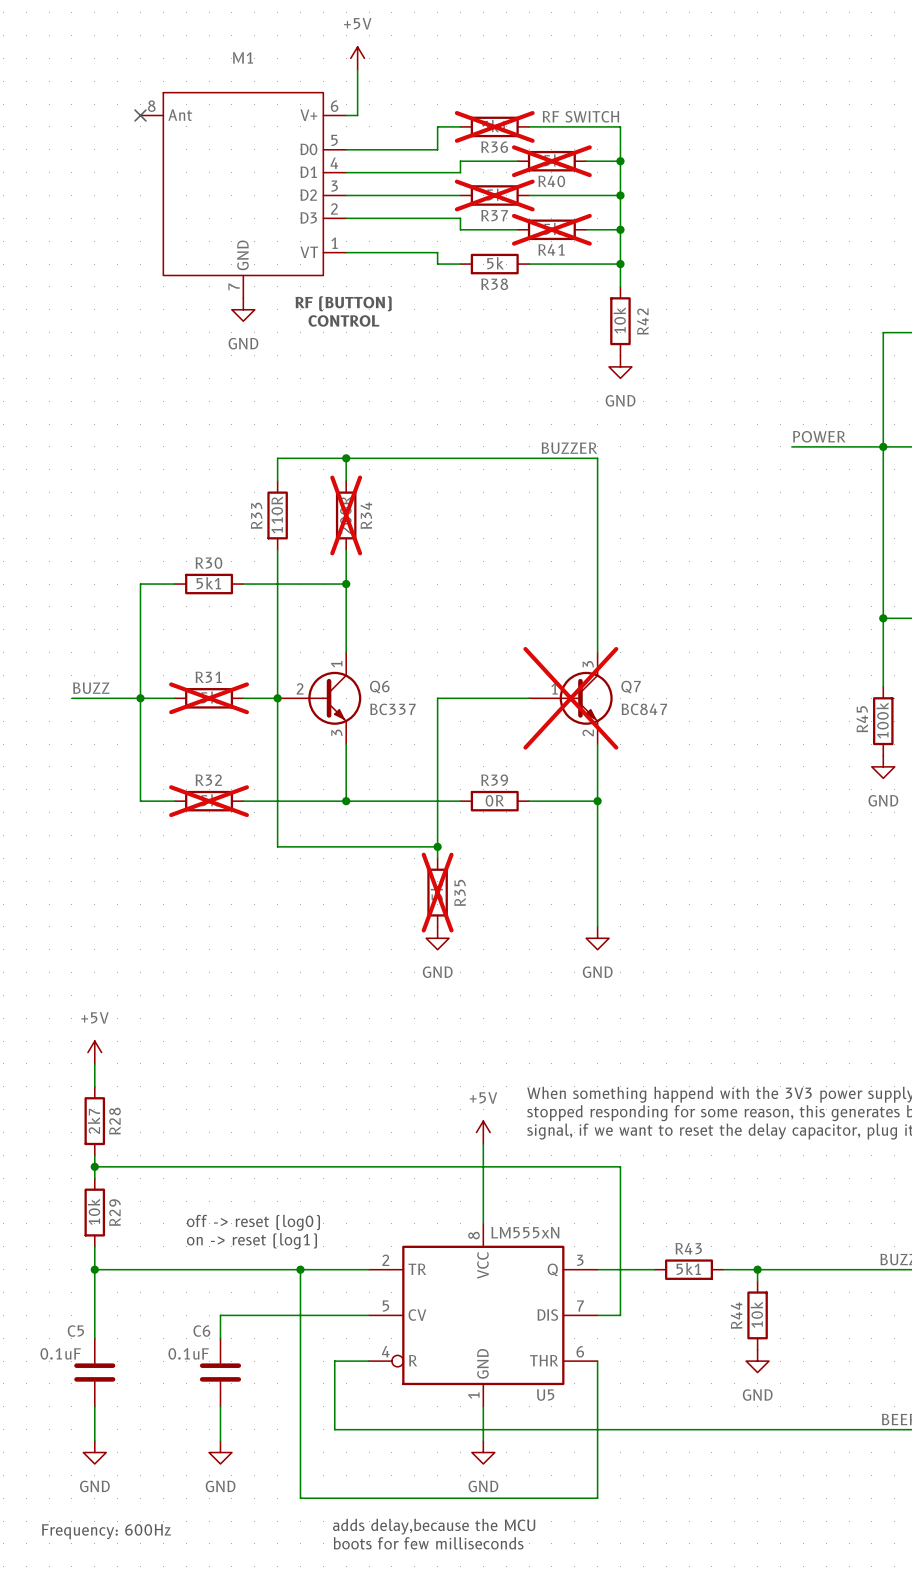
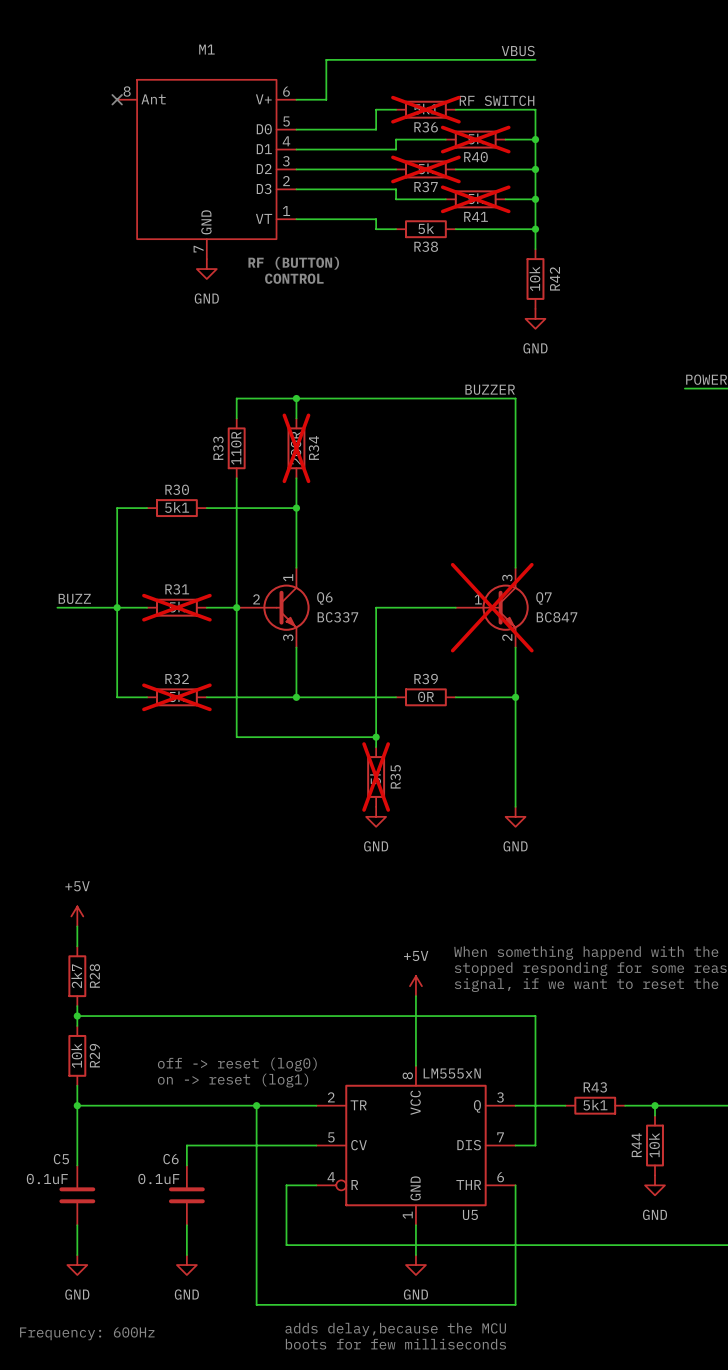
power symbol: +5V (357, 58) -> none
label: none -> VBUS (518, 51)
wire: (357, 69) (357, 115) -> (535, 59) (326, 59) (326, 99) (306, 99)

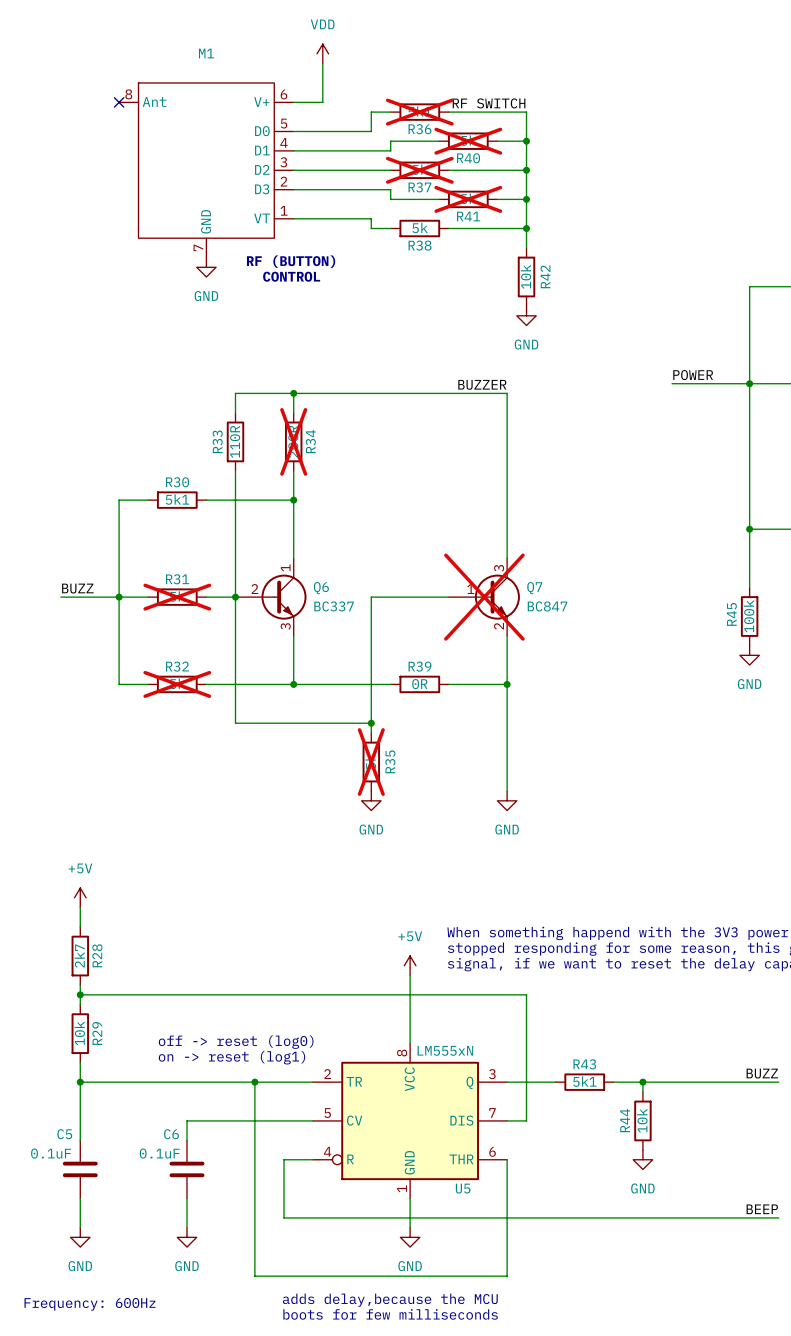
power symbol: none -> VDD (322, 53)
label: VBUS (518, 51) -> none
wire: (326, 59) (535, 59) -> none

